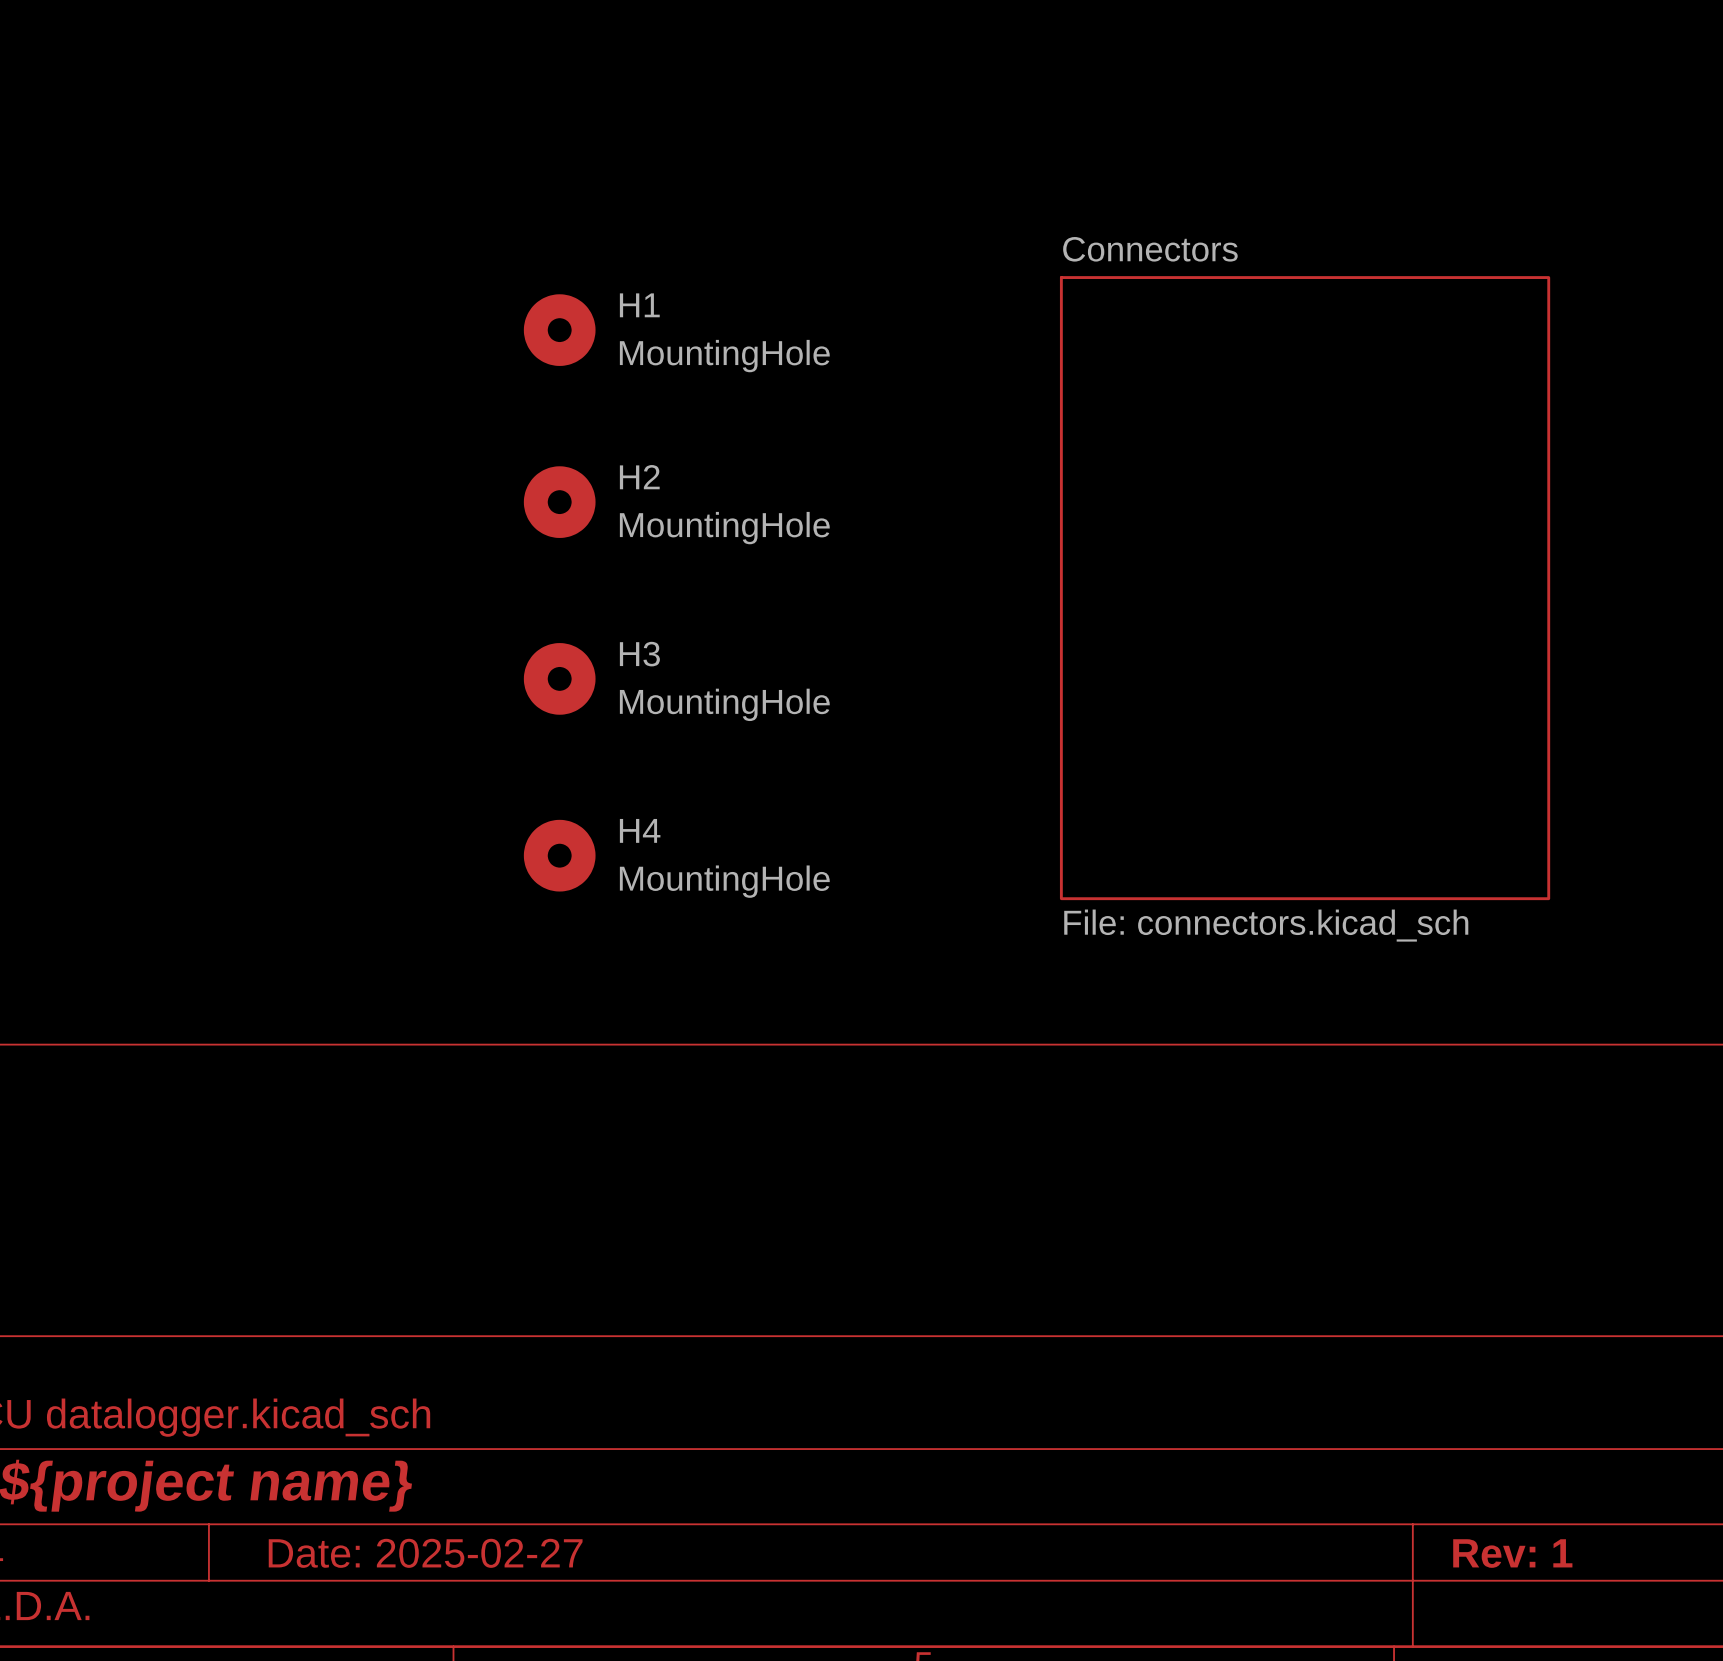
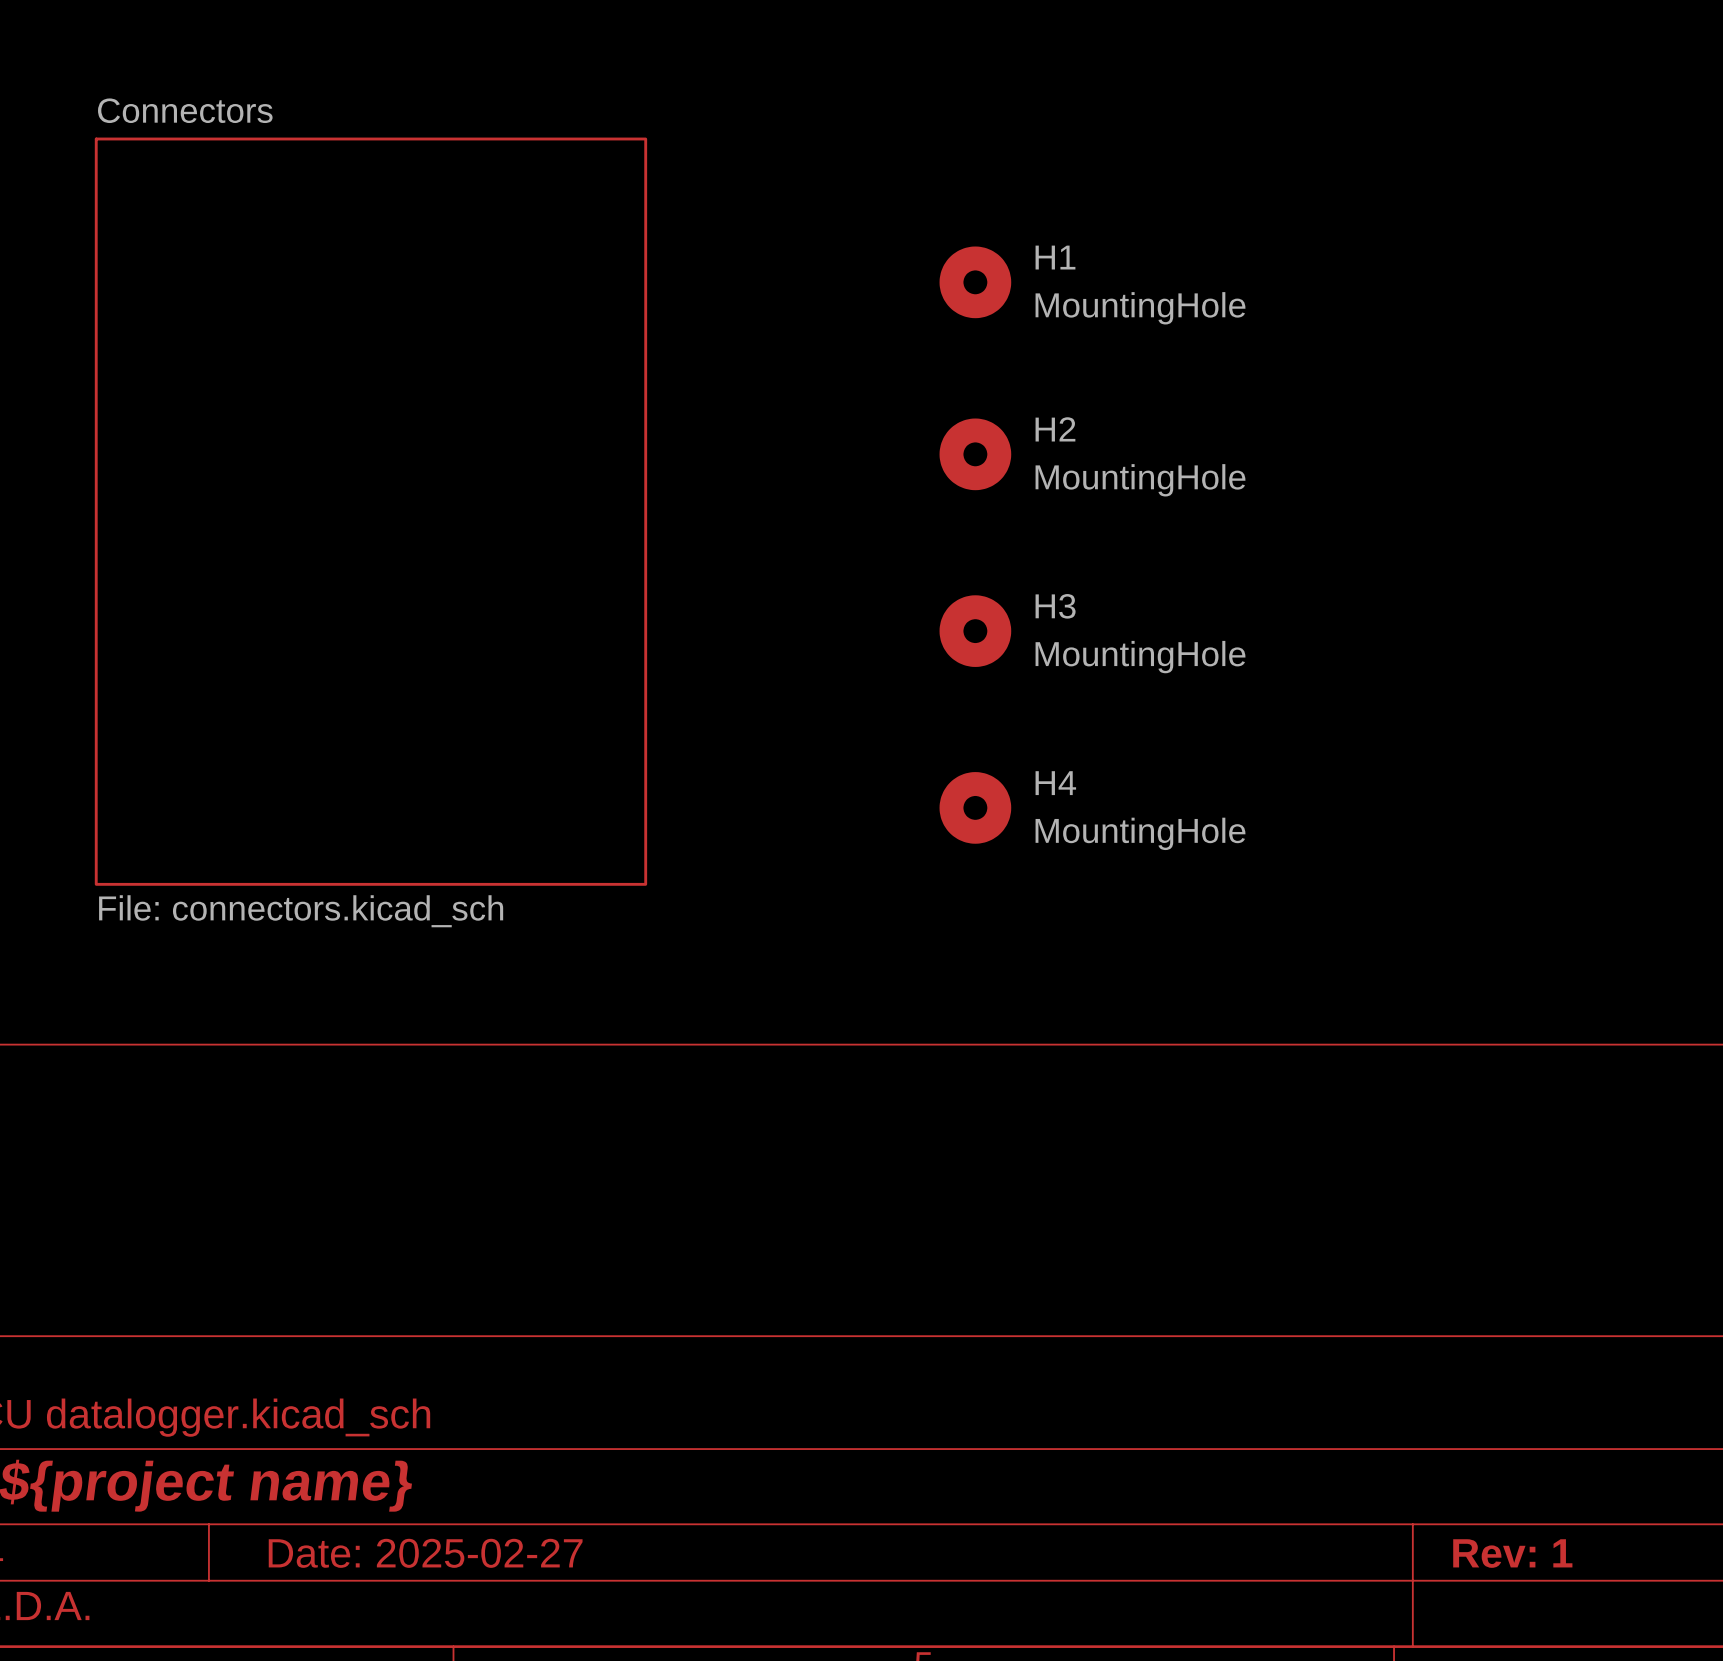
H1 position: (559, 330) -> (975, 282)
H2 position: (559, 502) -> (975, 454)
sheet Connectors: none -> File: connectors.kicad_sch (370, 511)
sheet Connectors: File: connectors.kicad_sch (1305, 588) -> none
H3 position: (559, 678) -> (975, 631)
H4 position: (559, 855) -> (975, 807)

